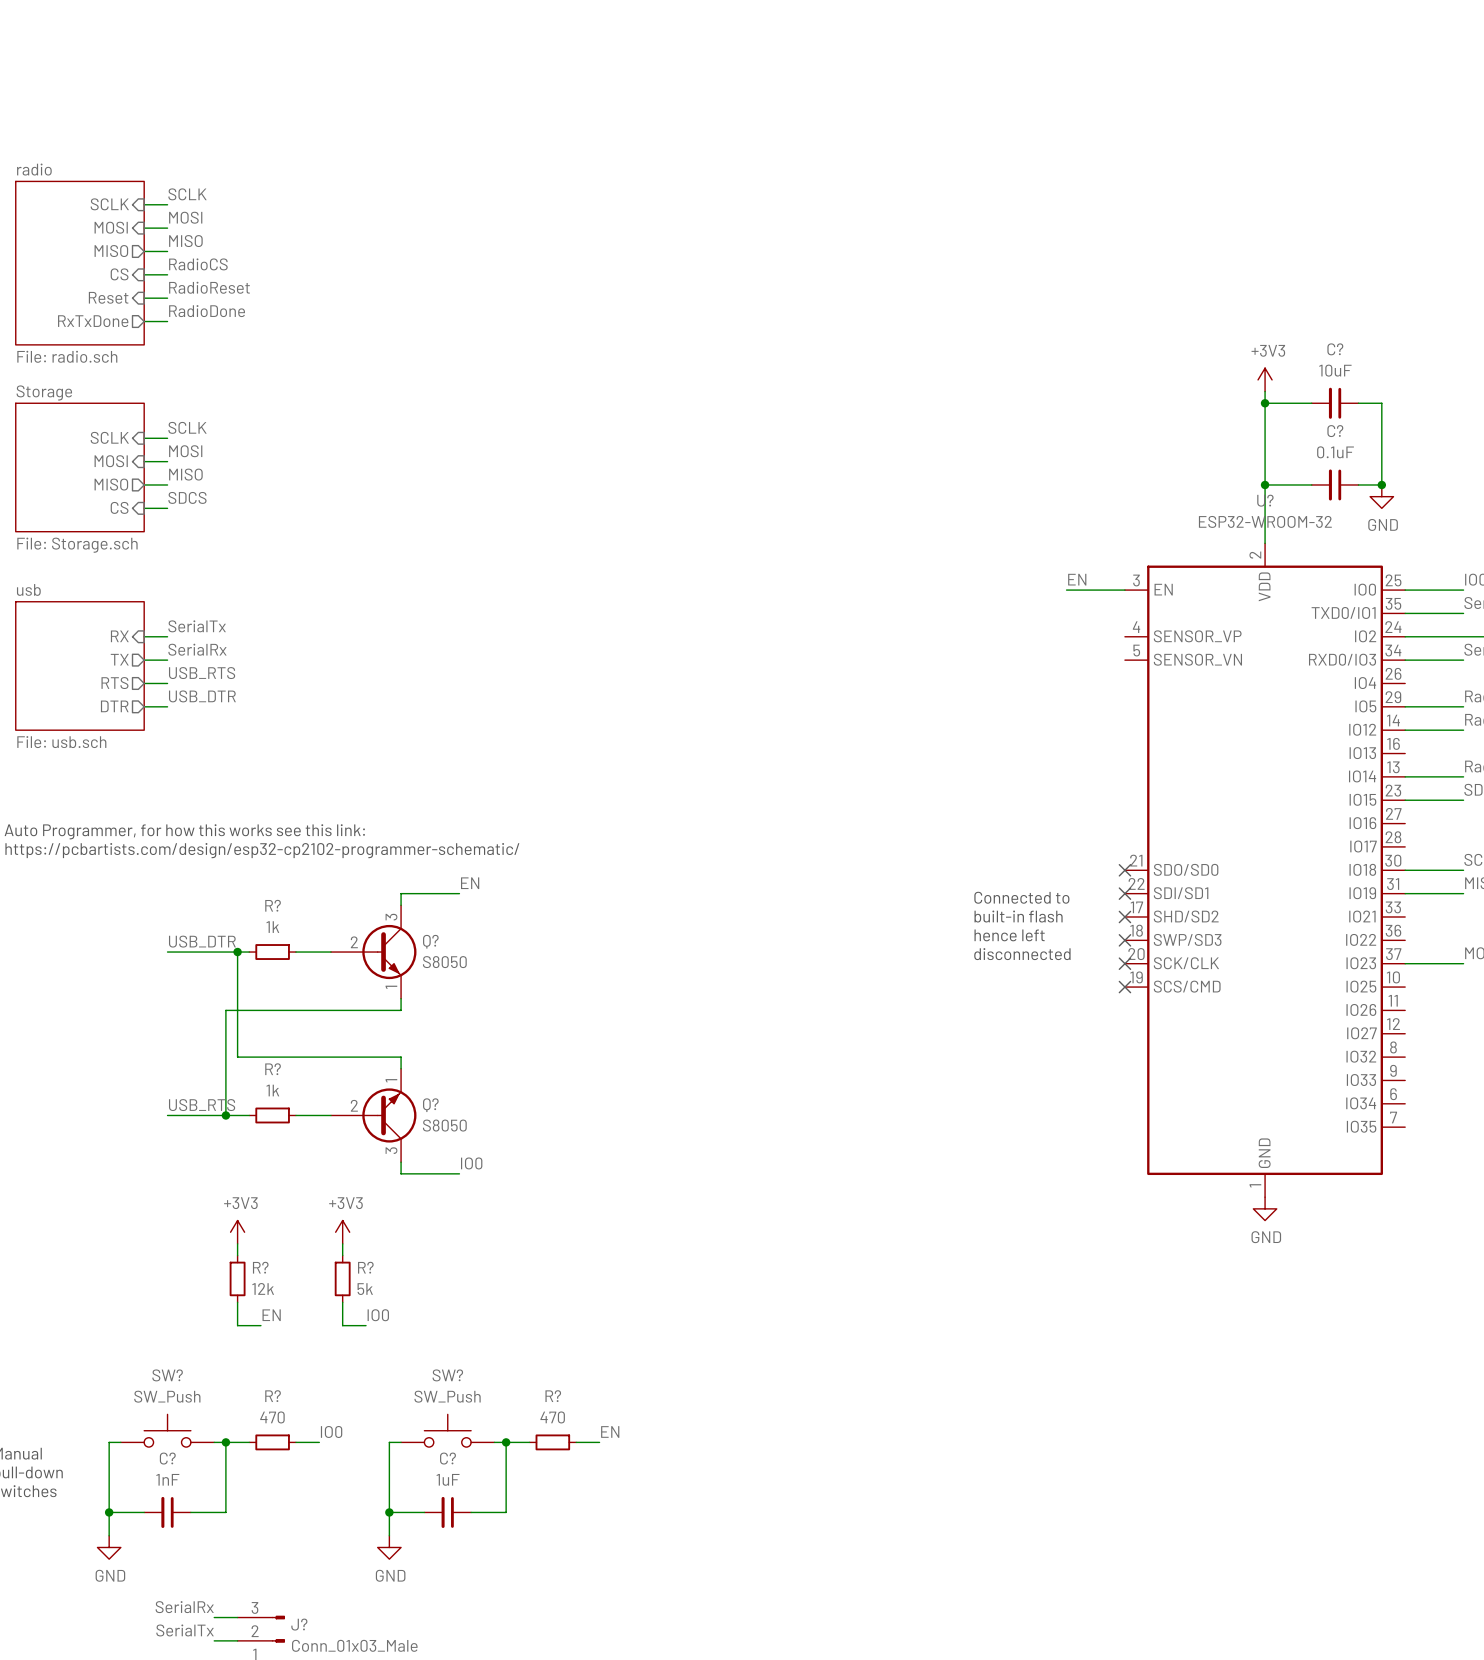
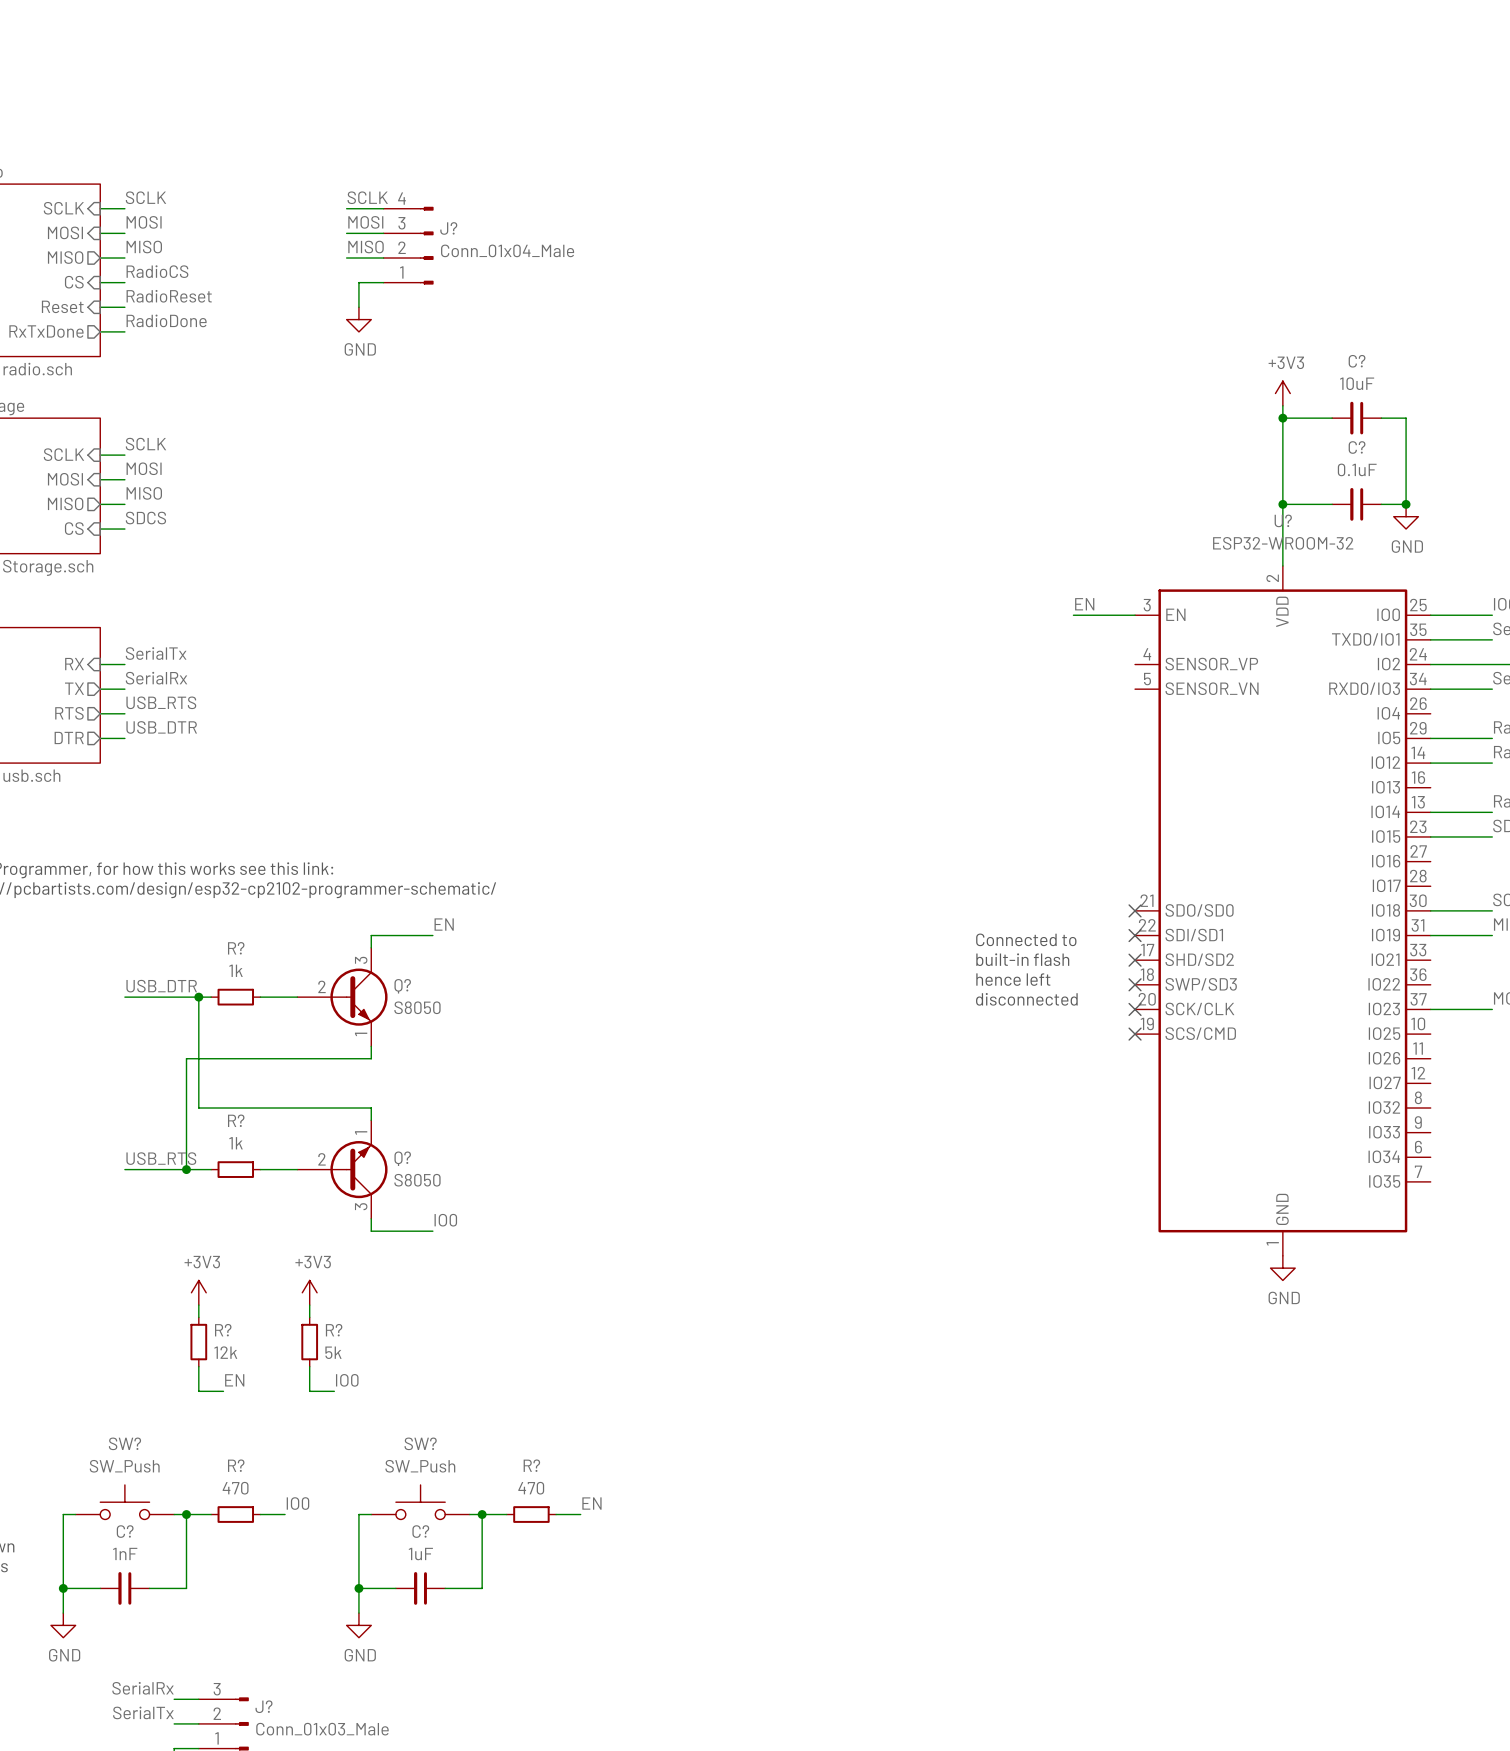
label: none -> SCLK (367, 197)
wire: none -> (346, 208) (383, 208)
label: none -> MOSI (365, 222)
wire: none -> (346, 233) (383, 233)
J?: none -> Conn_01x04_Male (408, 245)
label: none -> MISO (366, 247)
wire: none -> (346, 258) (383, 258)
wire: none -> (383, 282) (358, 282) (358, 307)
power symbol: none -> GND (358, 319)

